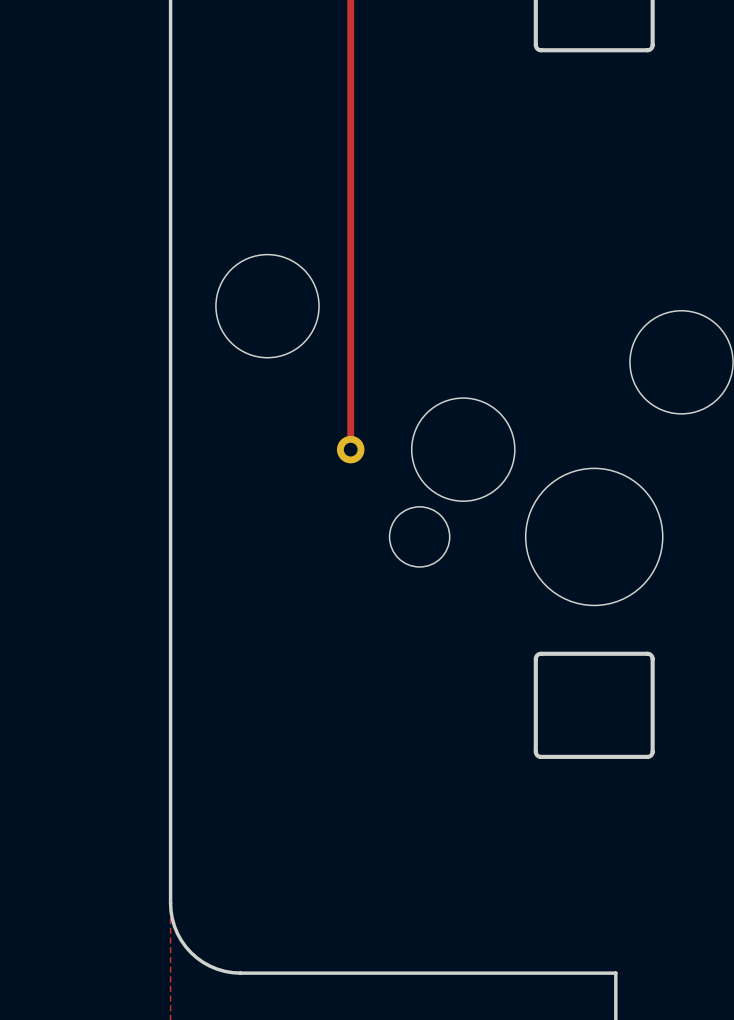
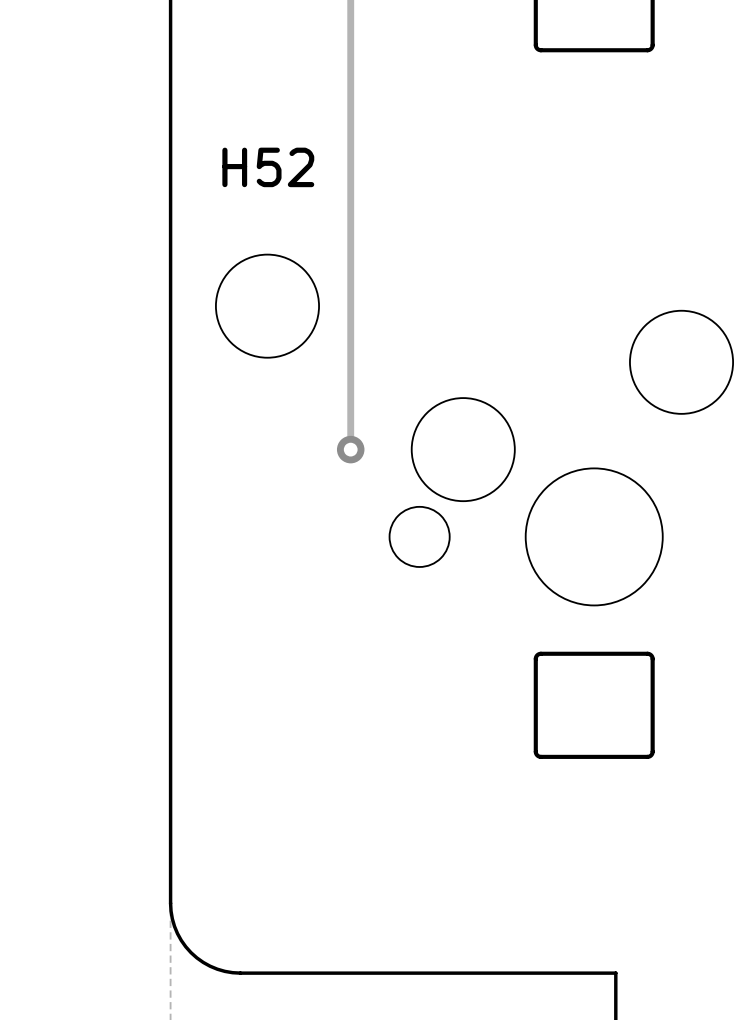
H52 name: none -> H52 (268, 167)

